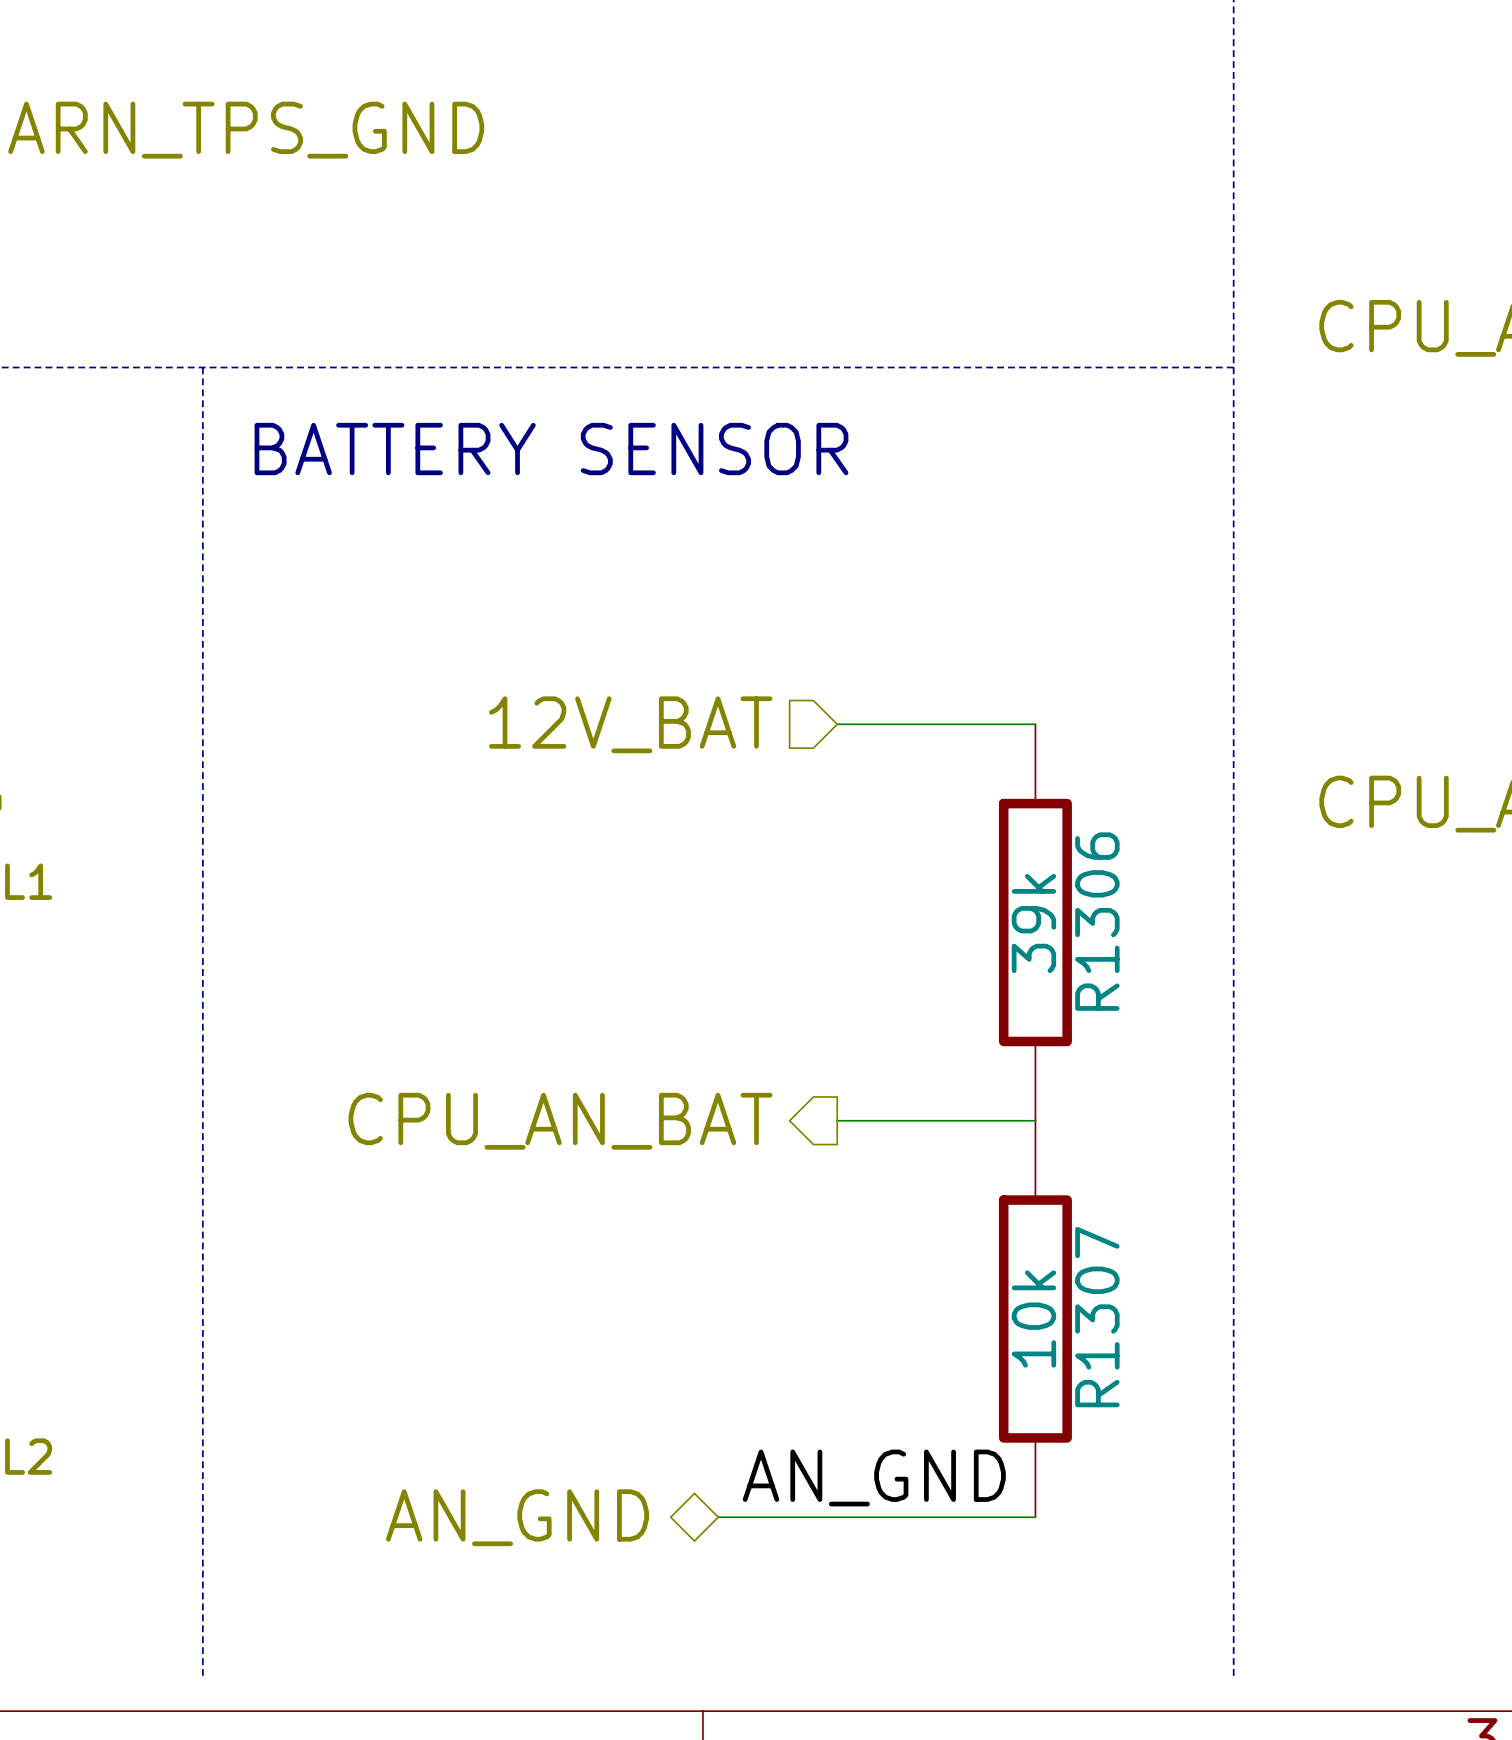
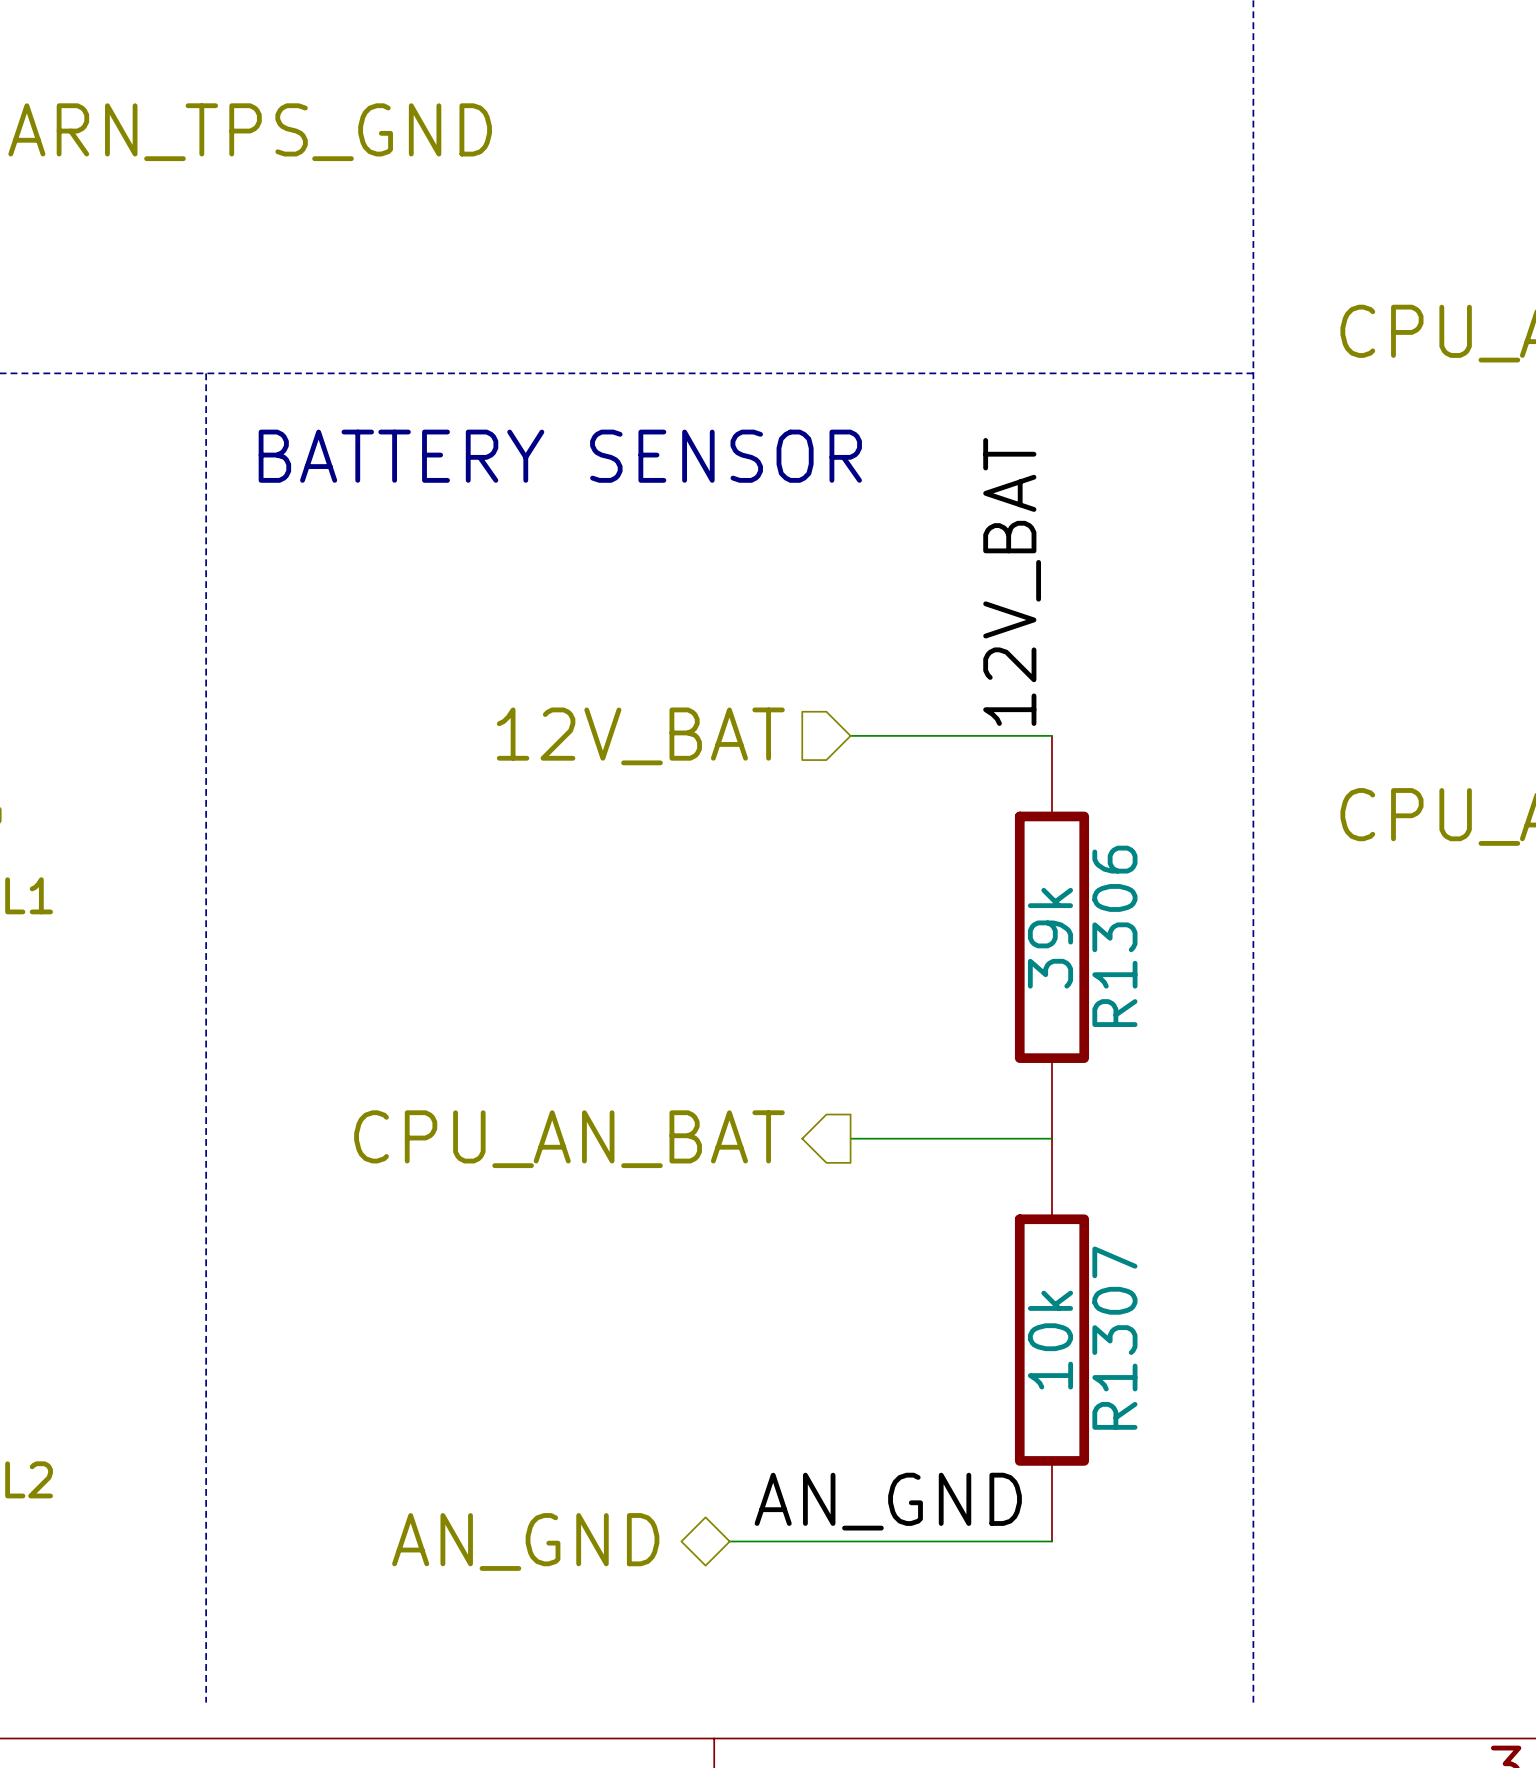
label: none -> 12V_BAT (1012, 581)

